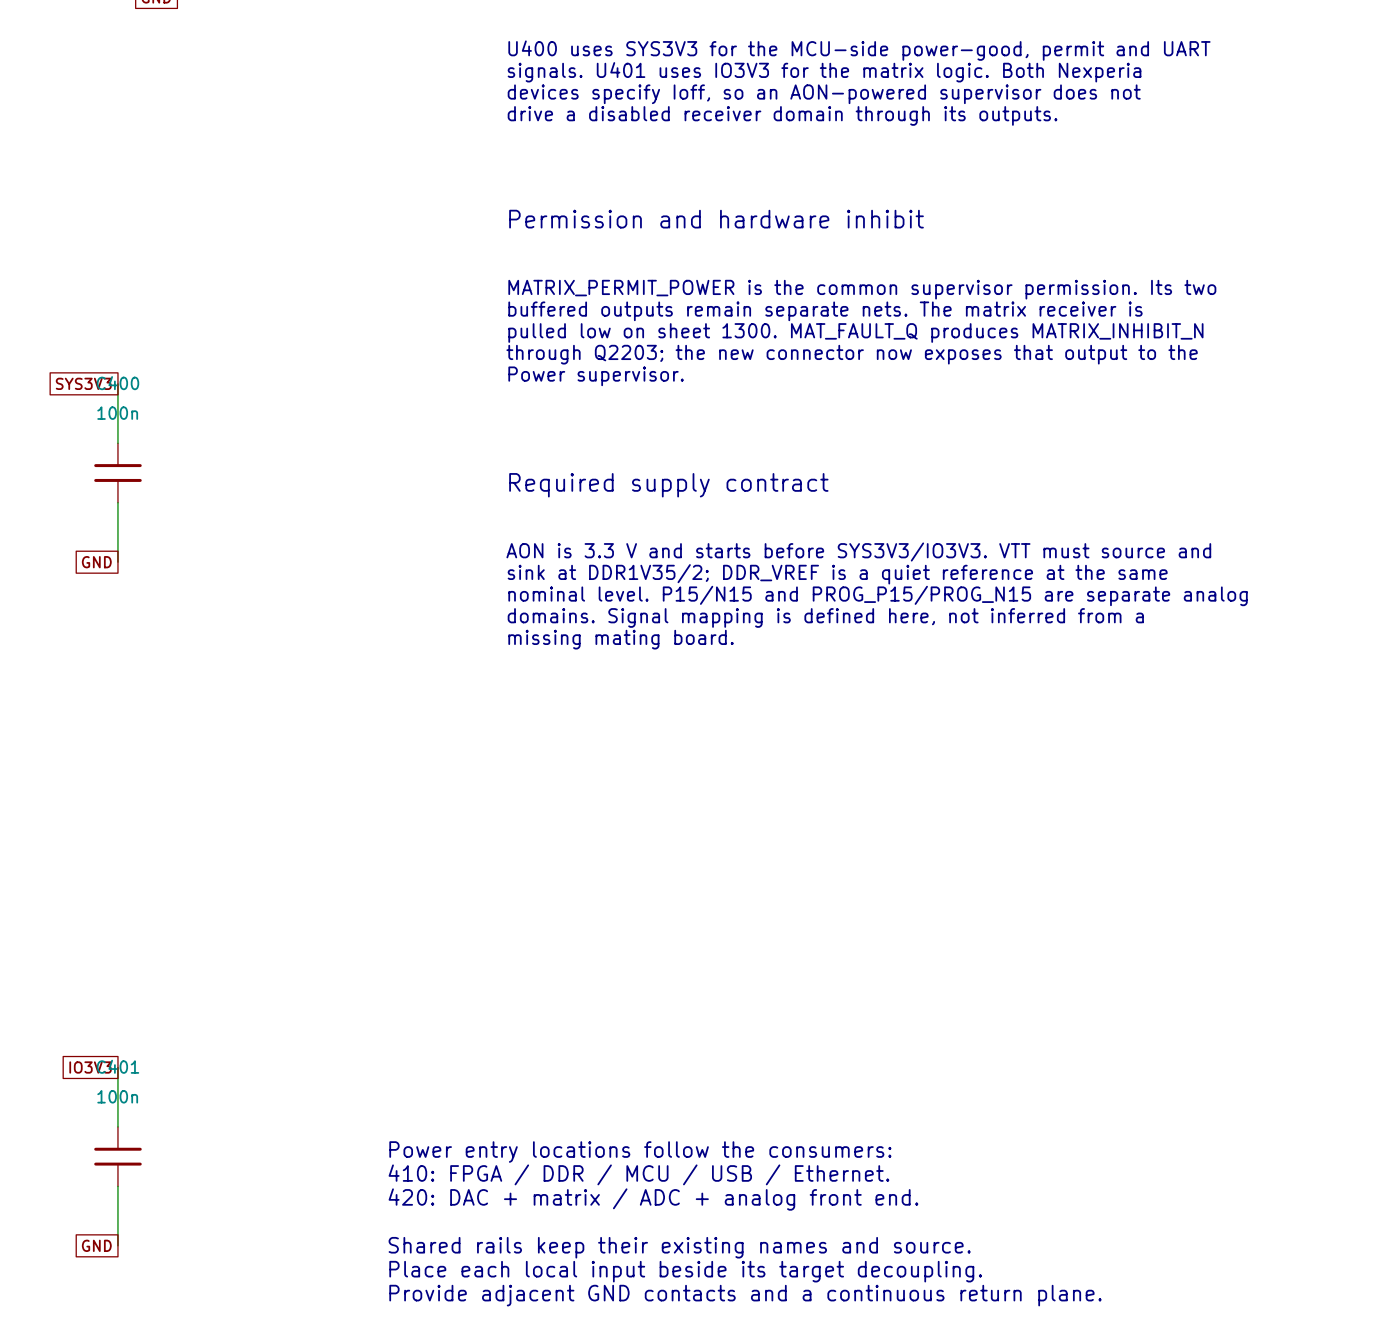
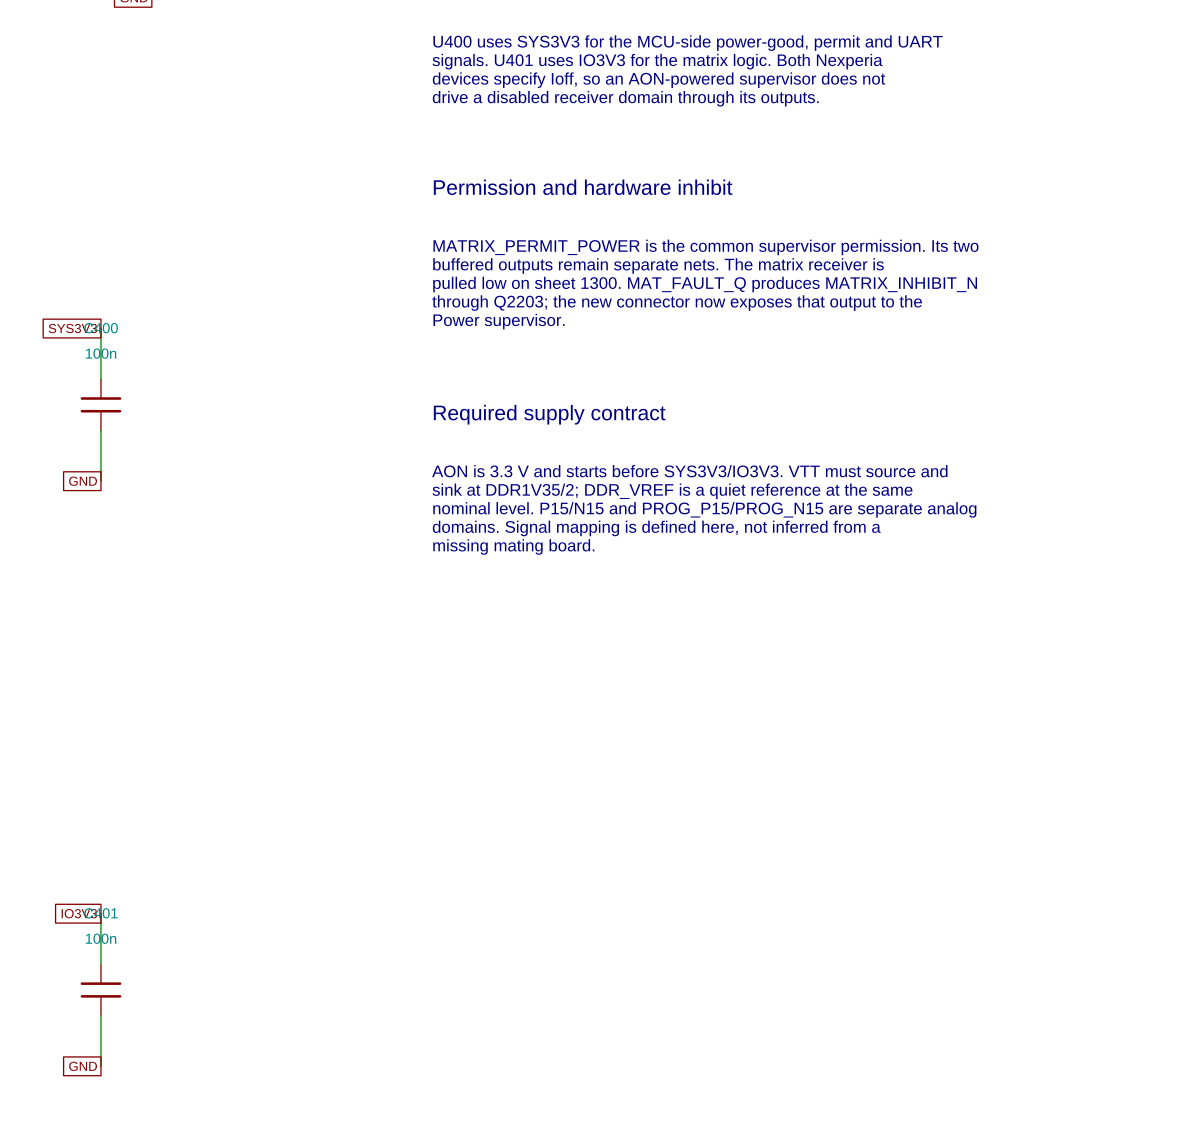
text: Power entry locations follow the consumers: (640, 1152) -> none
text: 410: FPGA / DDR / MCU / USB / Ethernet. (638, 1174) -> none
text: 420: DAC + matrix / ADC + analog front end. (653, 1199) -> none
text: Shared rails keep their existing names and source. (679, 1247) -> none
text: Place each local input beside its target decoupling. (685, 1271) -> none
text: Provide adjacent GND contacts and a continuous return plane. (745, 1295) -> none

